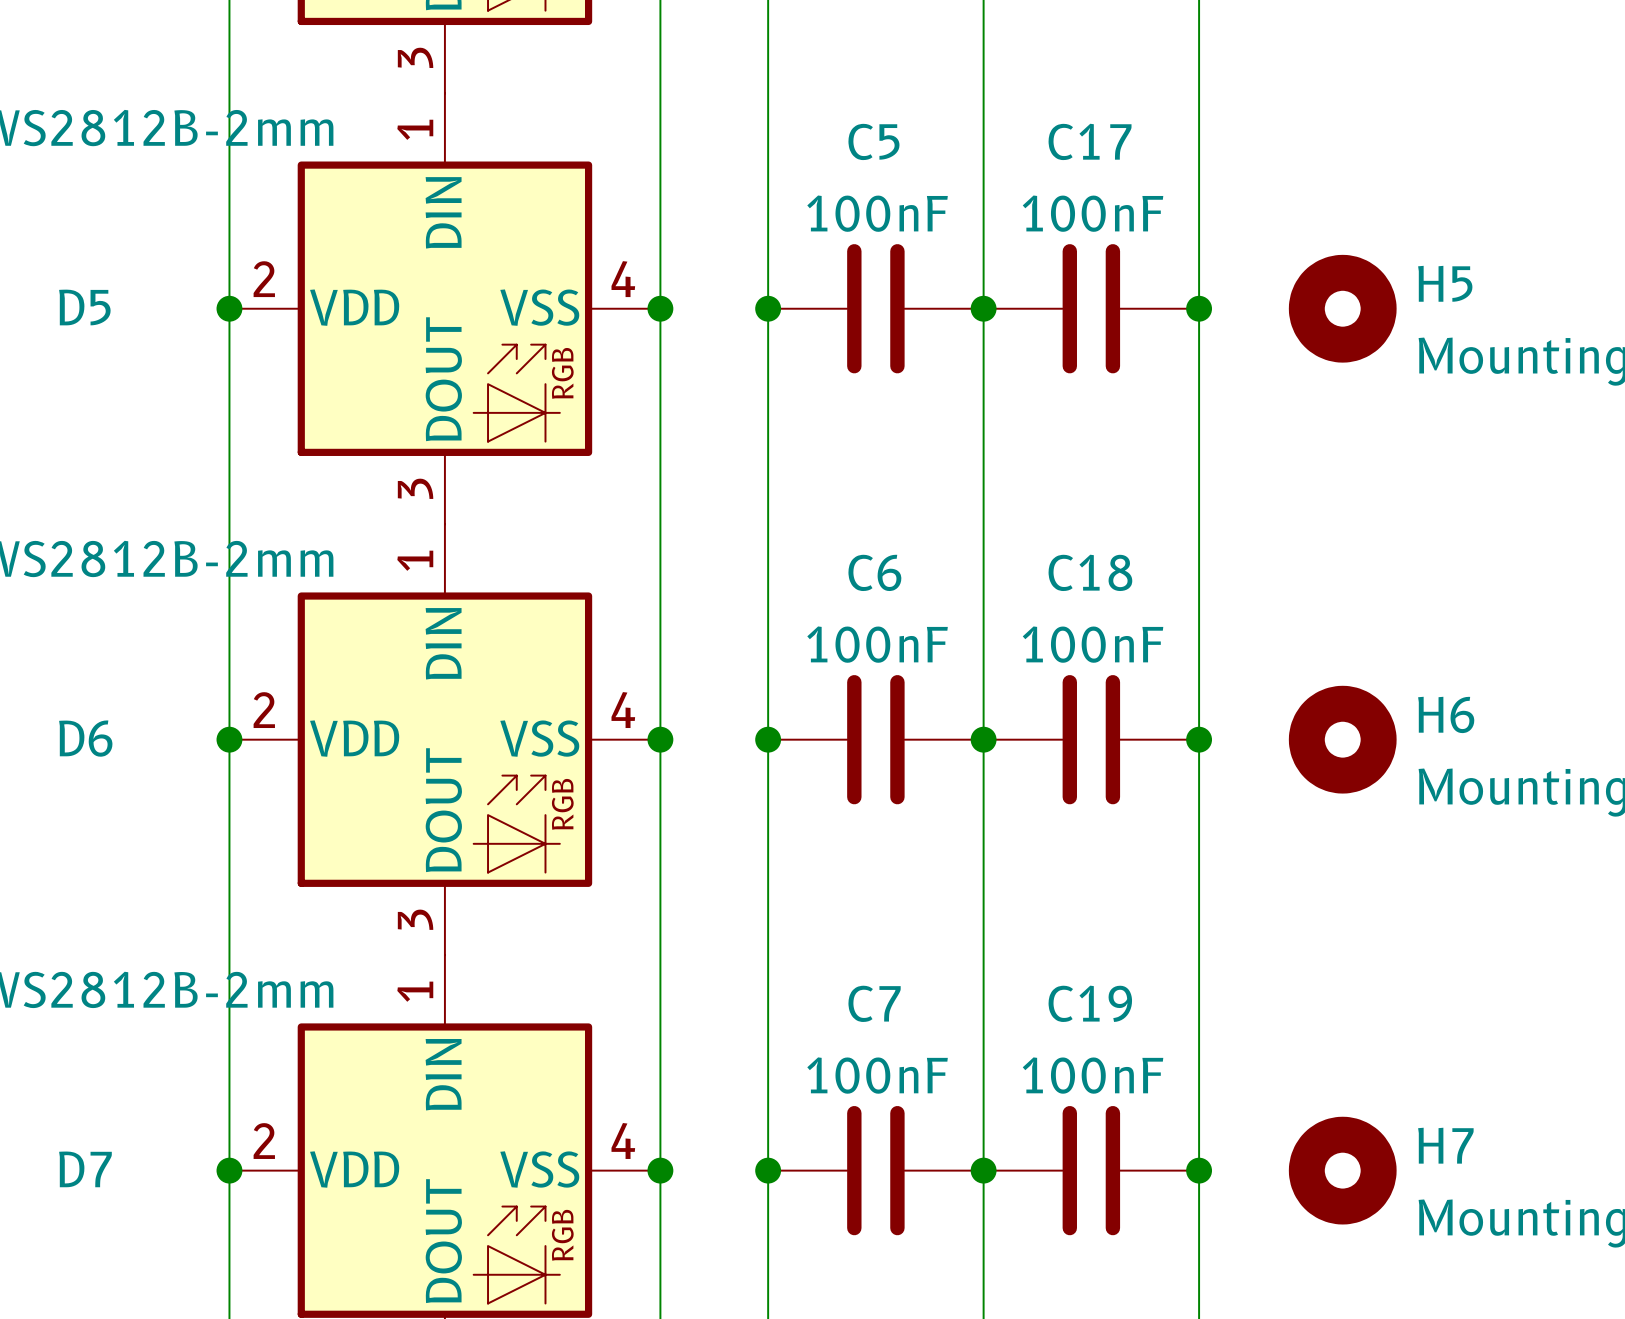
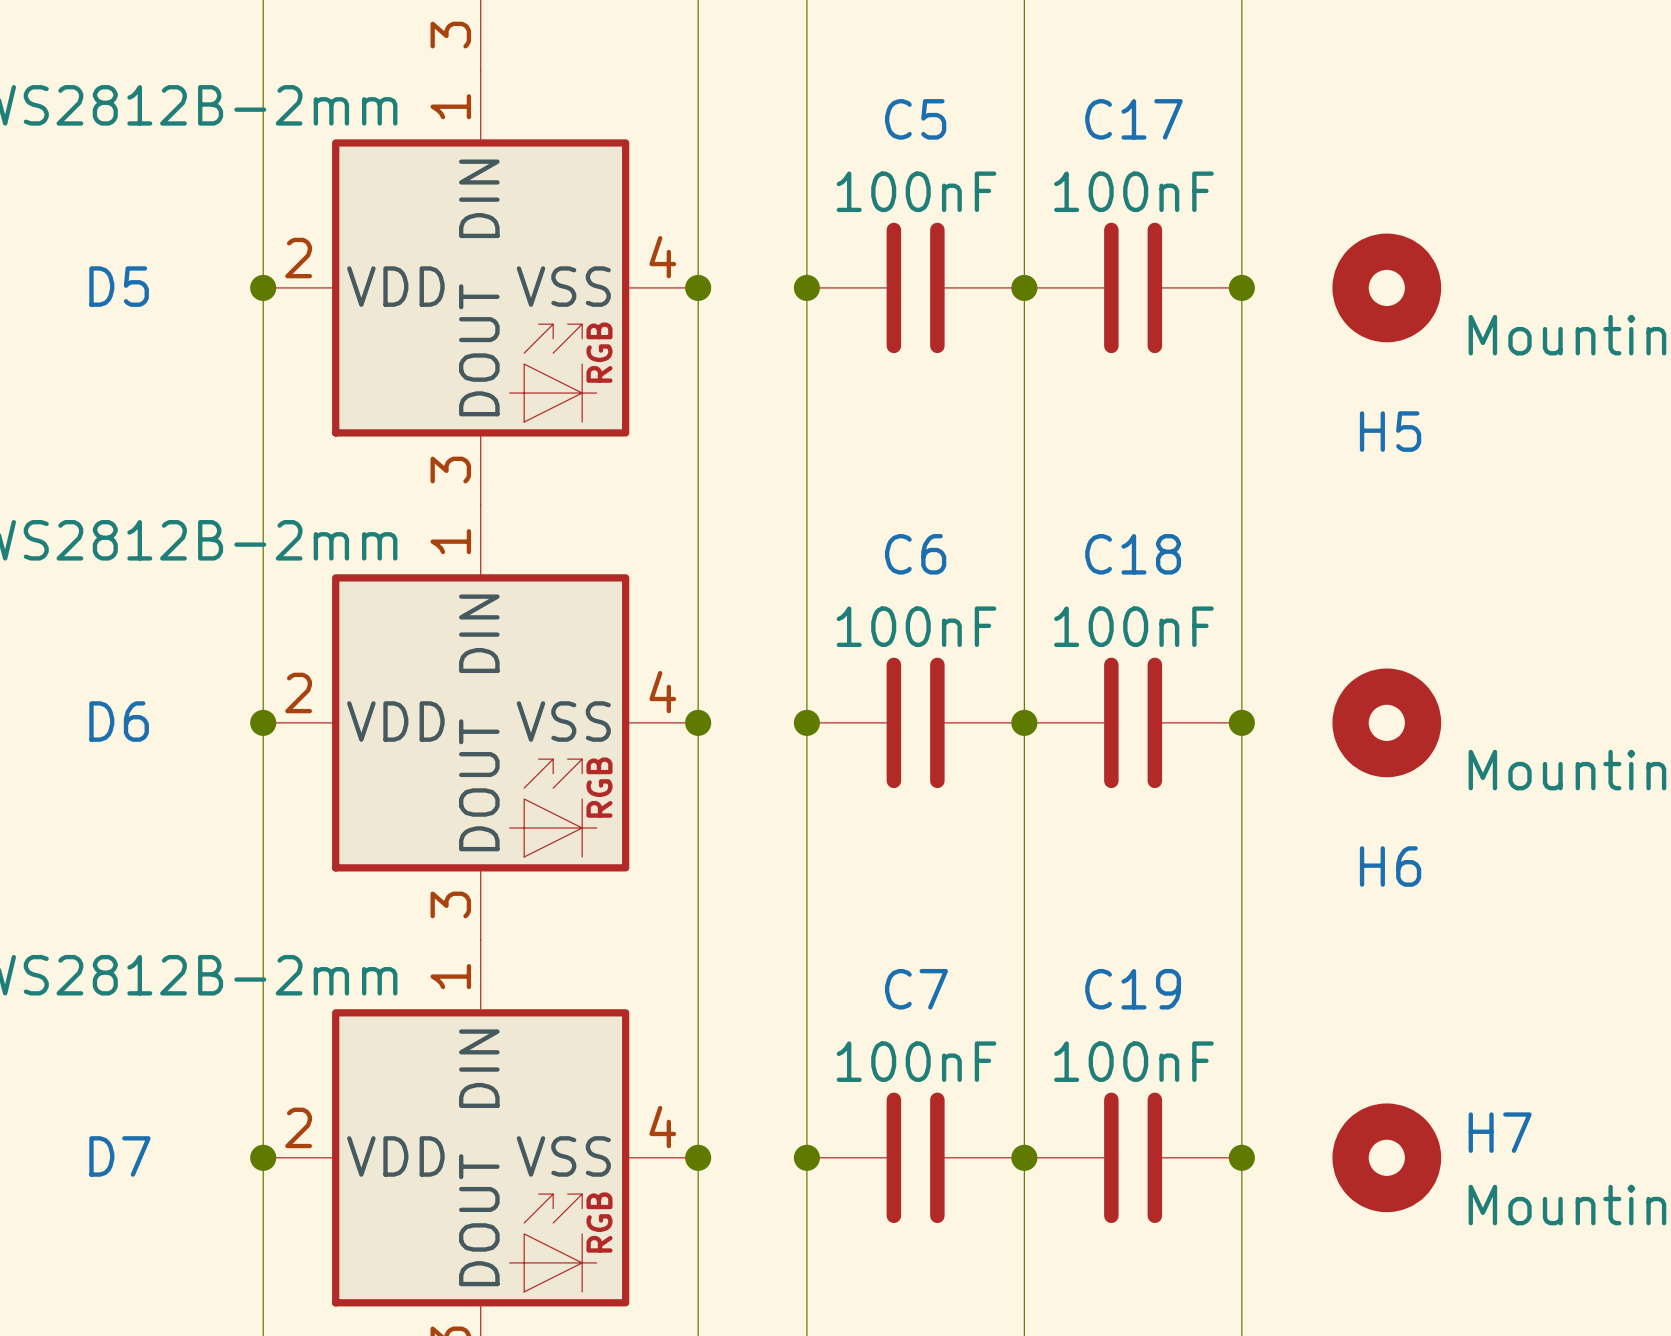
H5 name position: H5 (1445, 283) -> H5 (1390, 431)
H6 name position: H6 (1446, 714) -> H6 (1390, 866)

